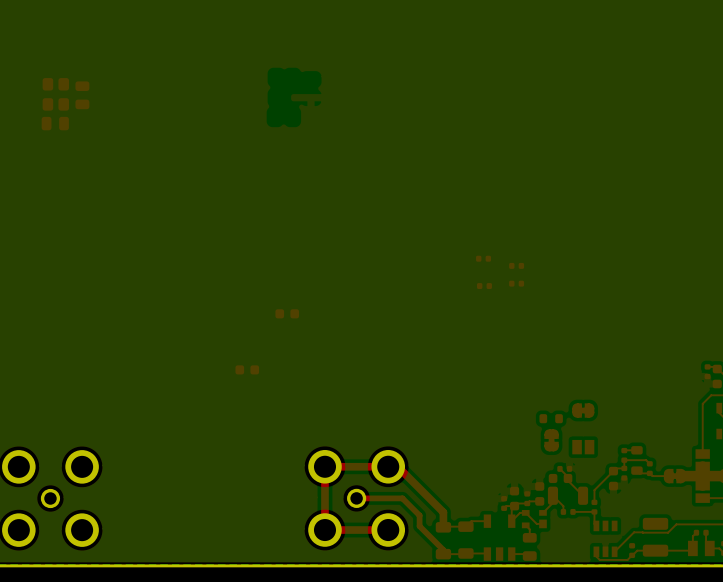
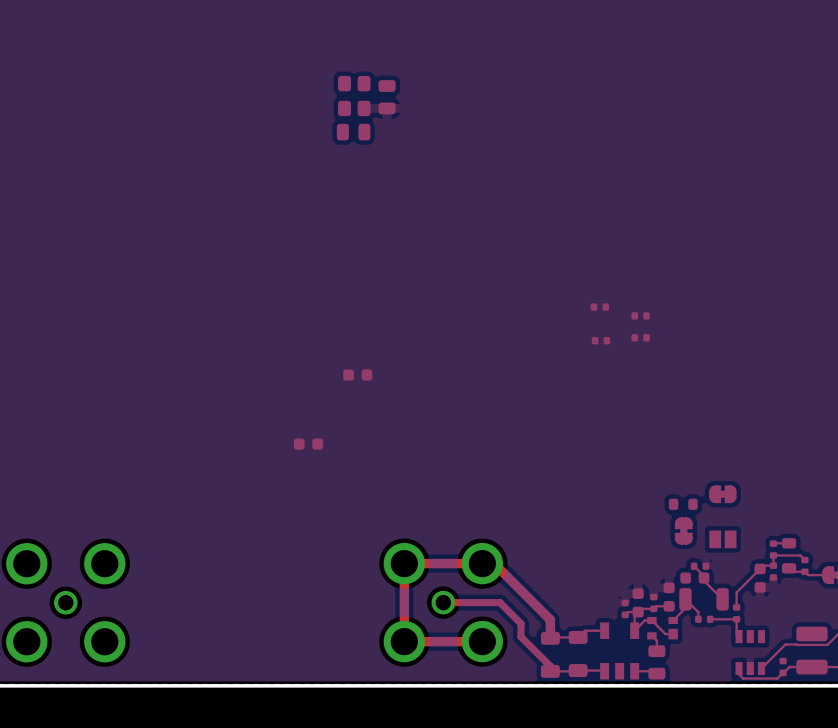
part position: (55, 94) -> (354, 96)
part position: (82, 95) -> (387, 97)
part position: (55, 123) -> (353, 132)

